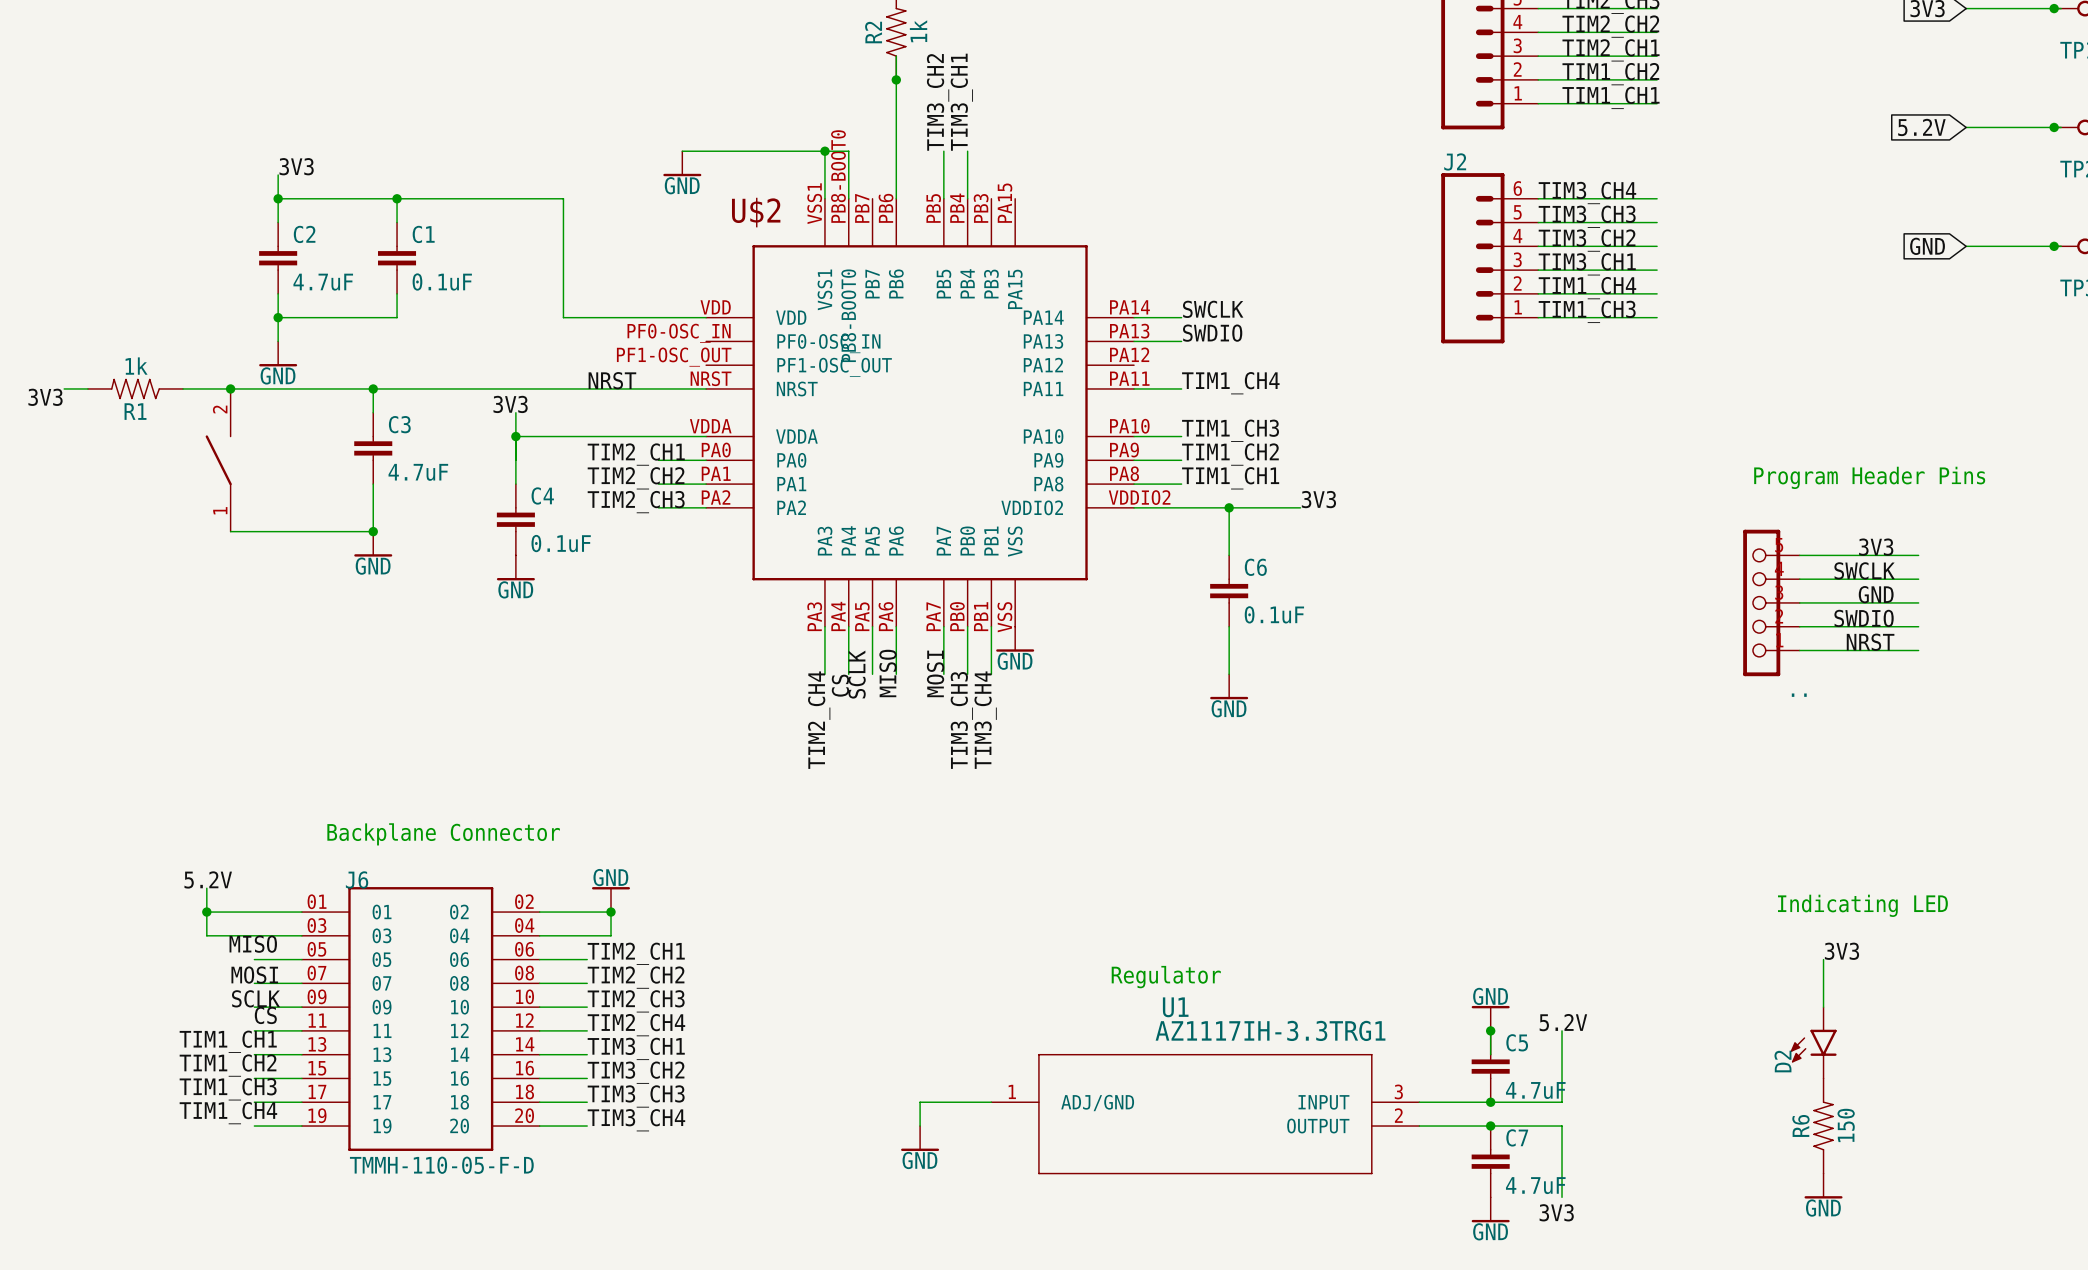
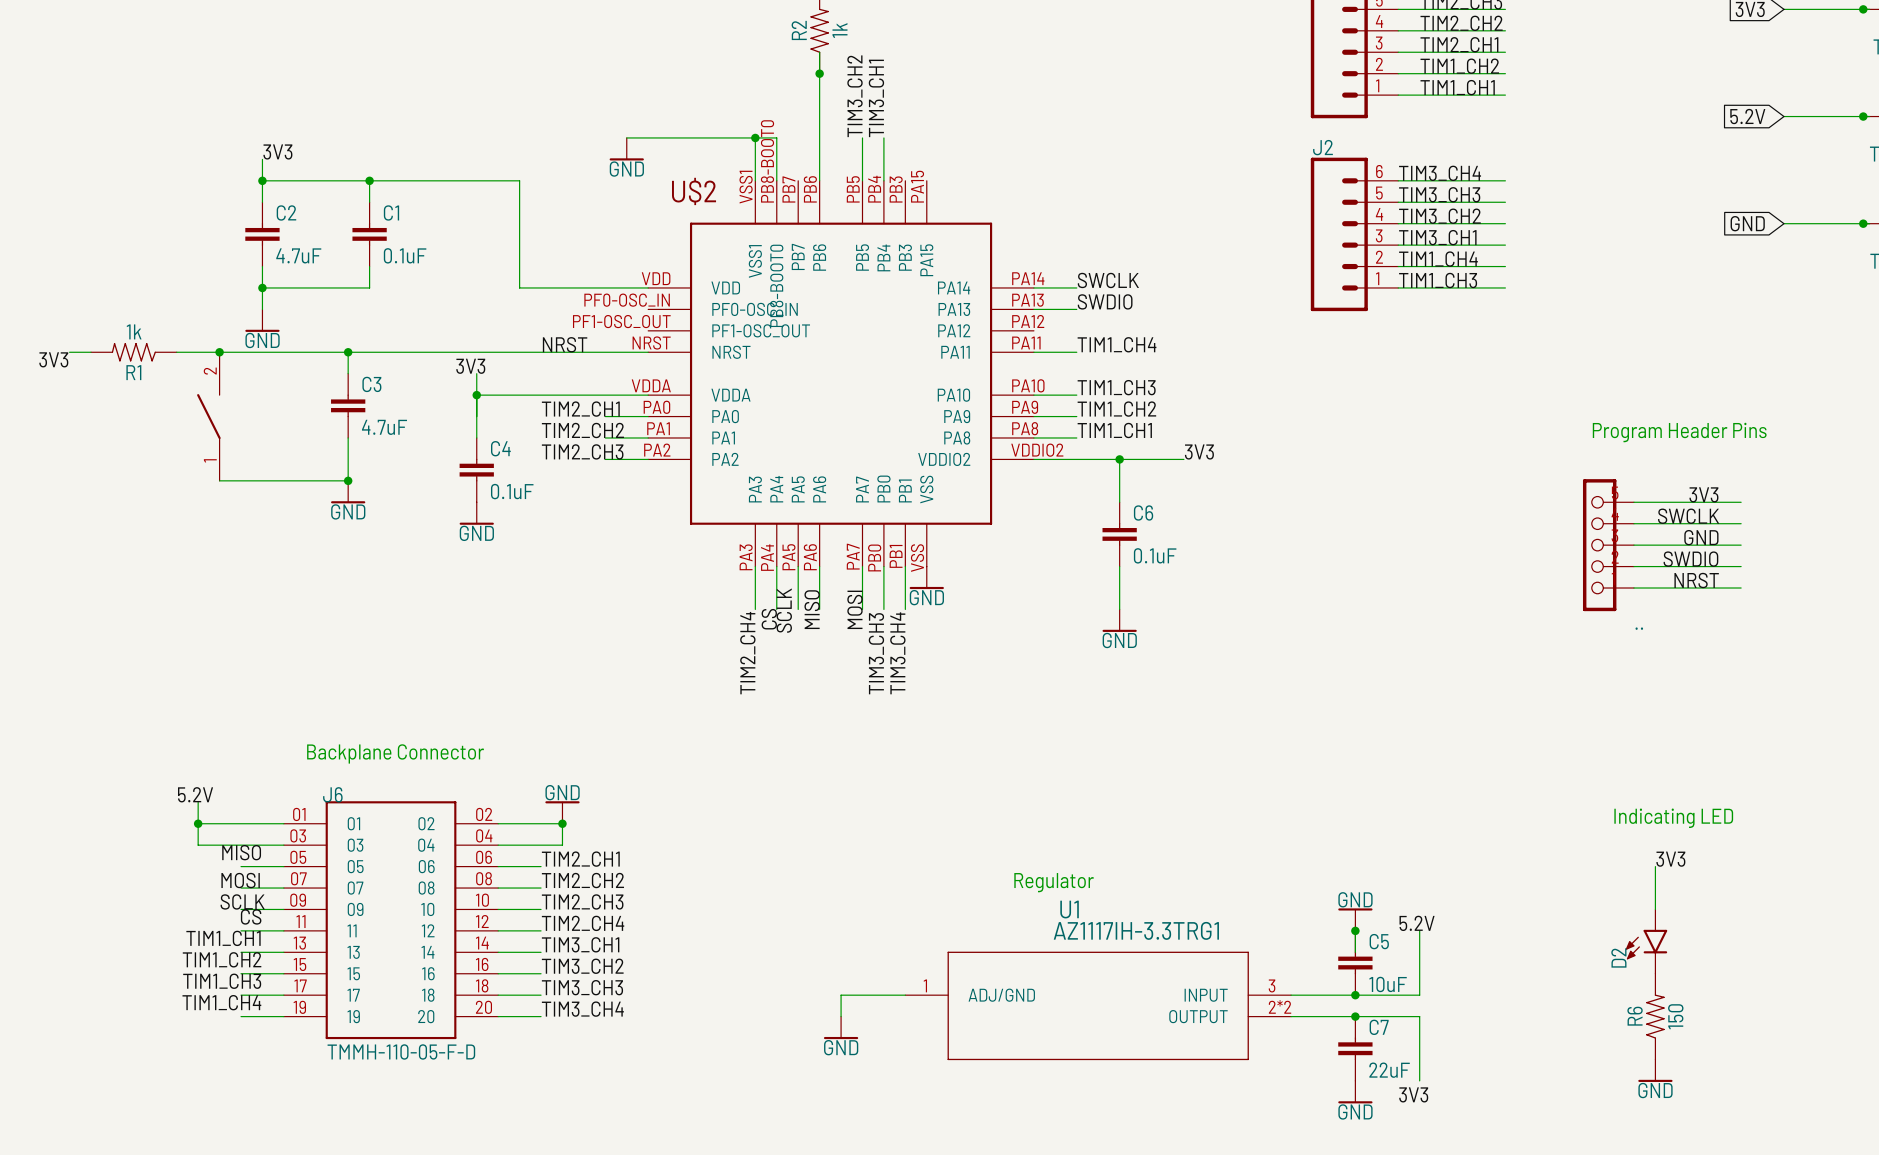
C5 value: 4.7uF (1535, 1090) -> 10uF (1388, 984)
U1 pin number: 2 (1398, 1115) -> 2*2 (1280, 1006)
C7 value: 4.7uF (1535, 1185) -> 22uF (1389, 1070)

